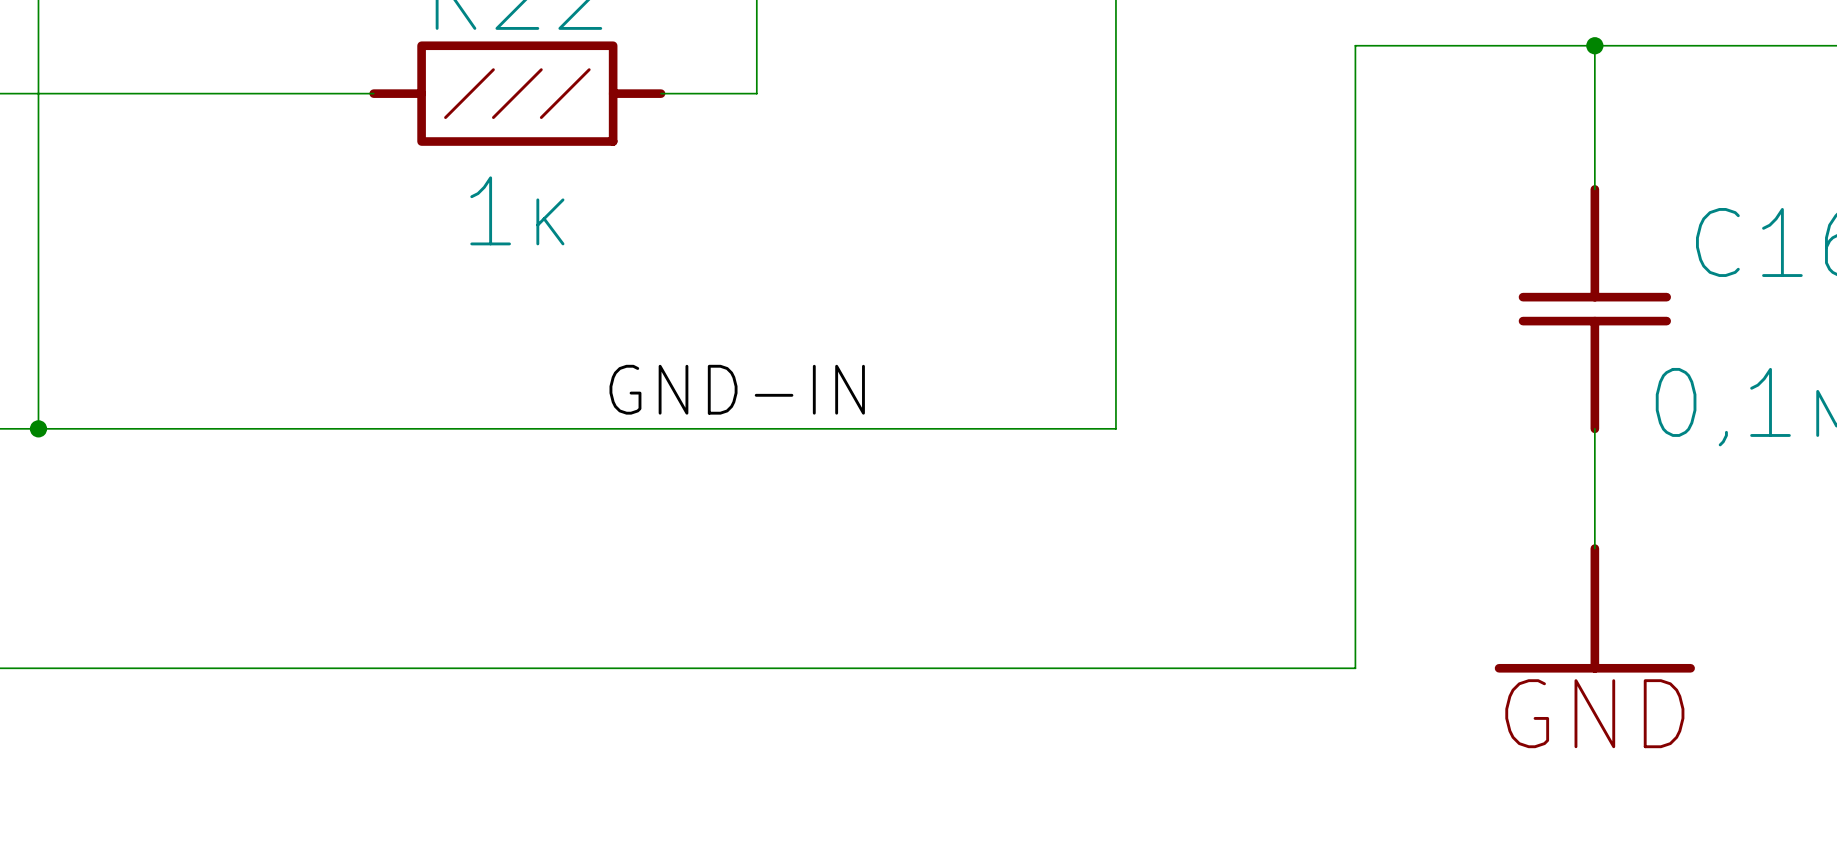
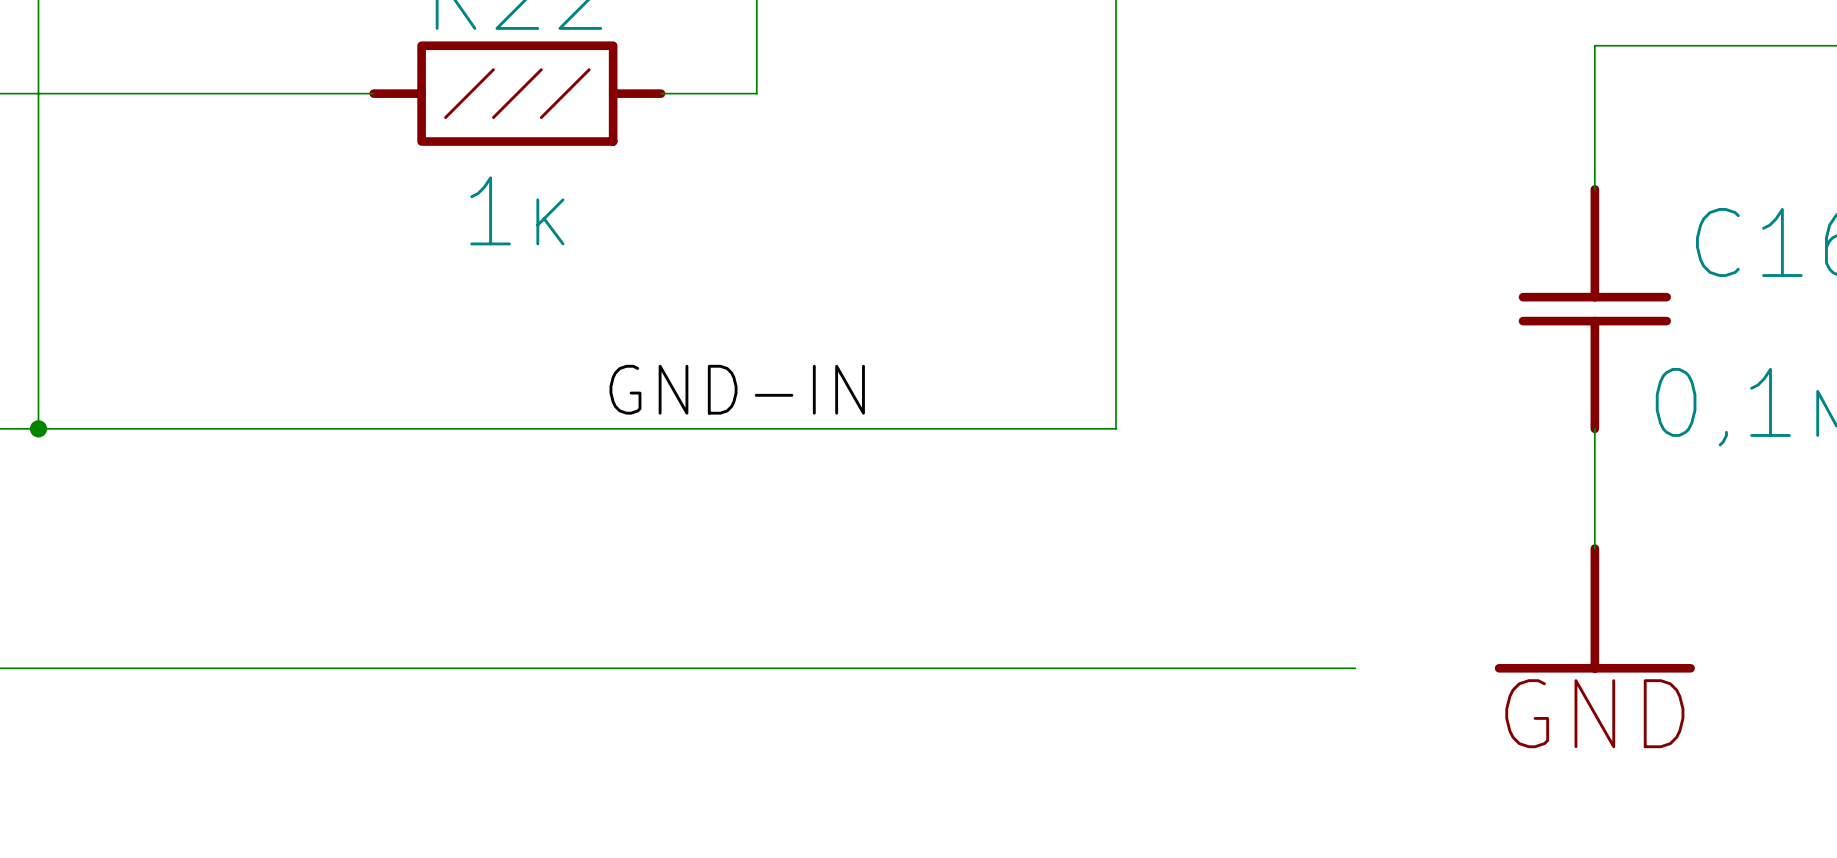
wire: (1594, 45) (1355, 45) (1355, 668) -> none
junction: (1594, 45) -> none

